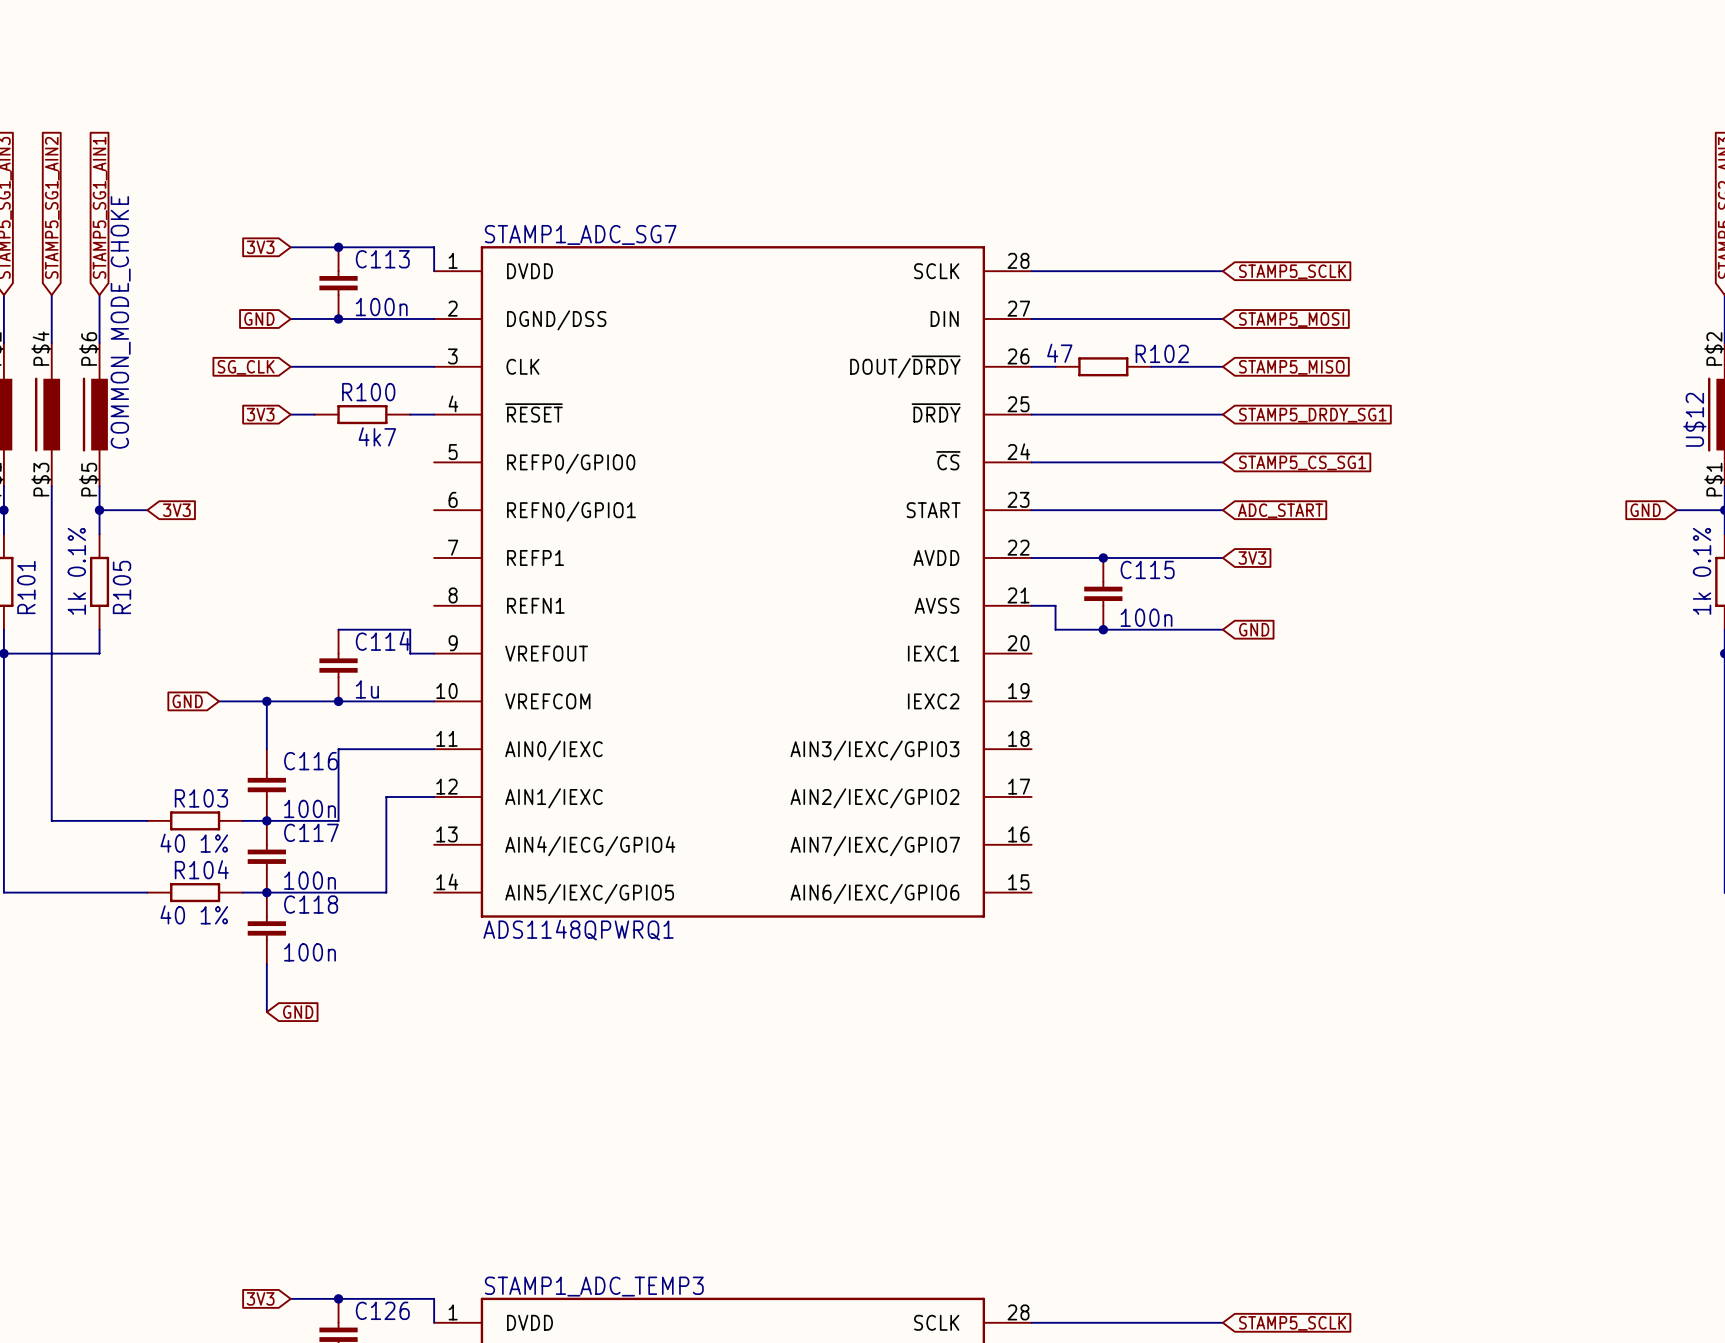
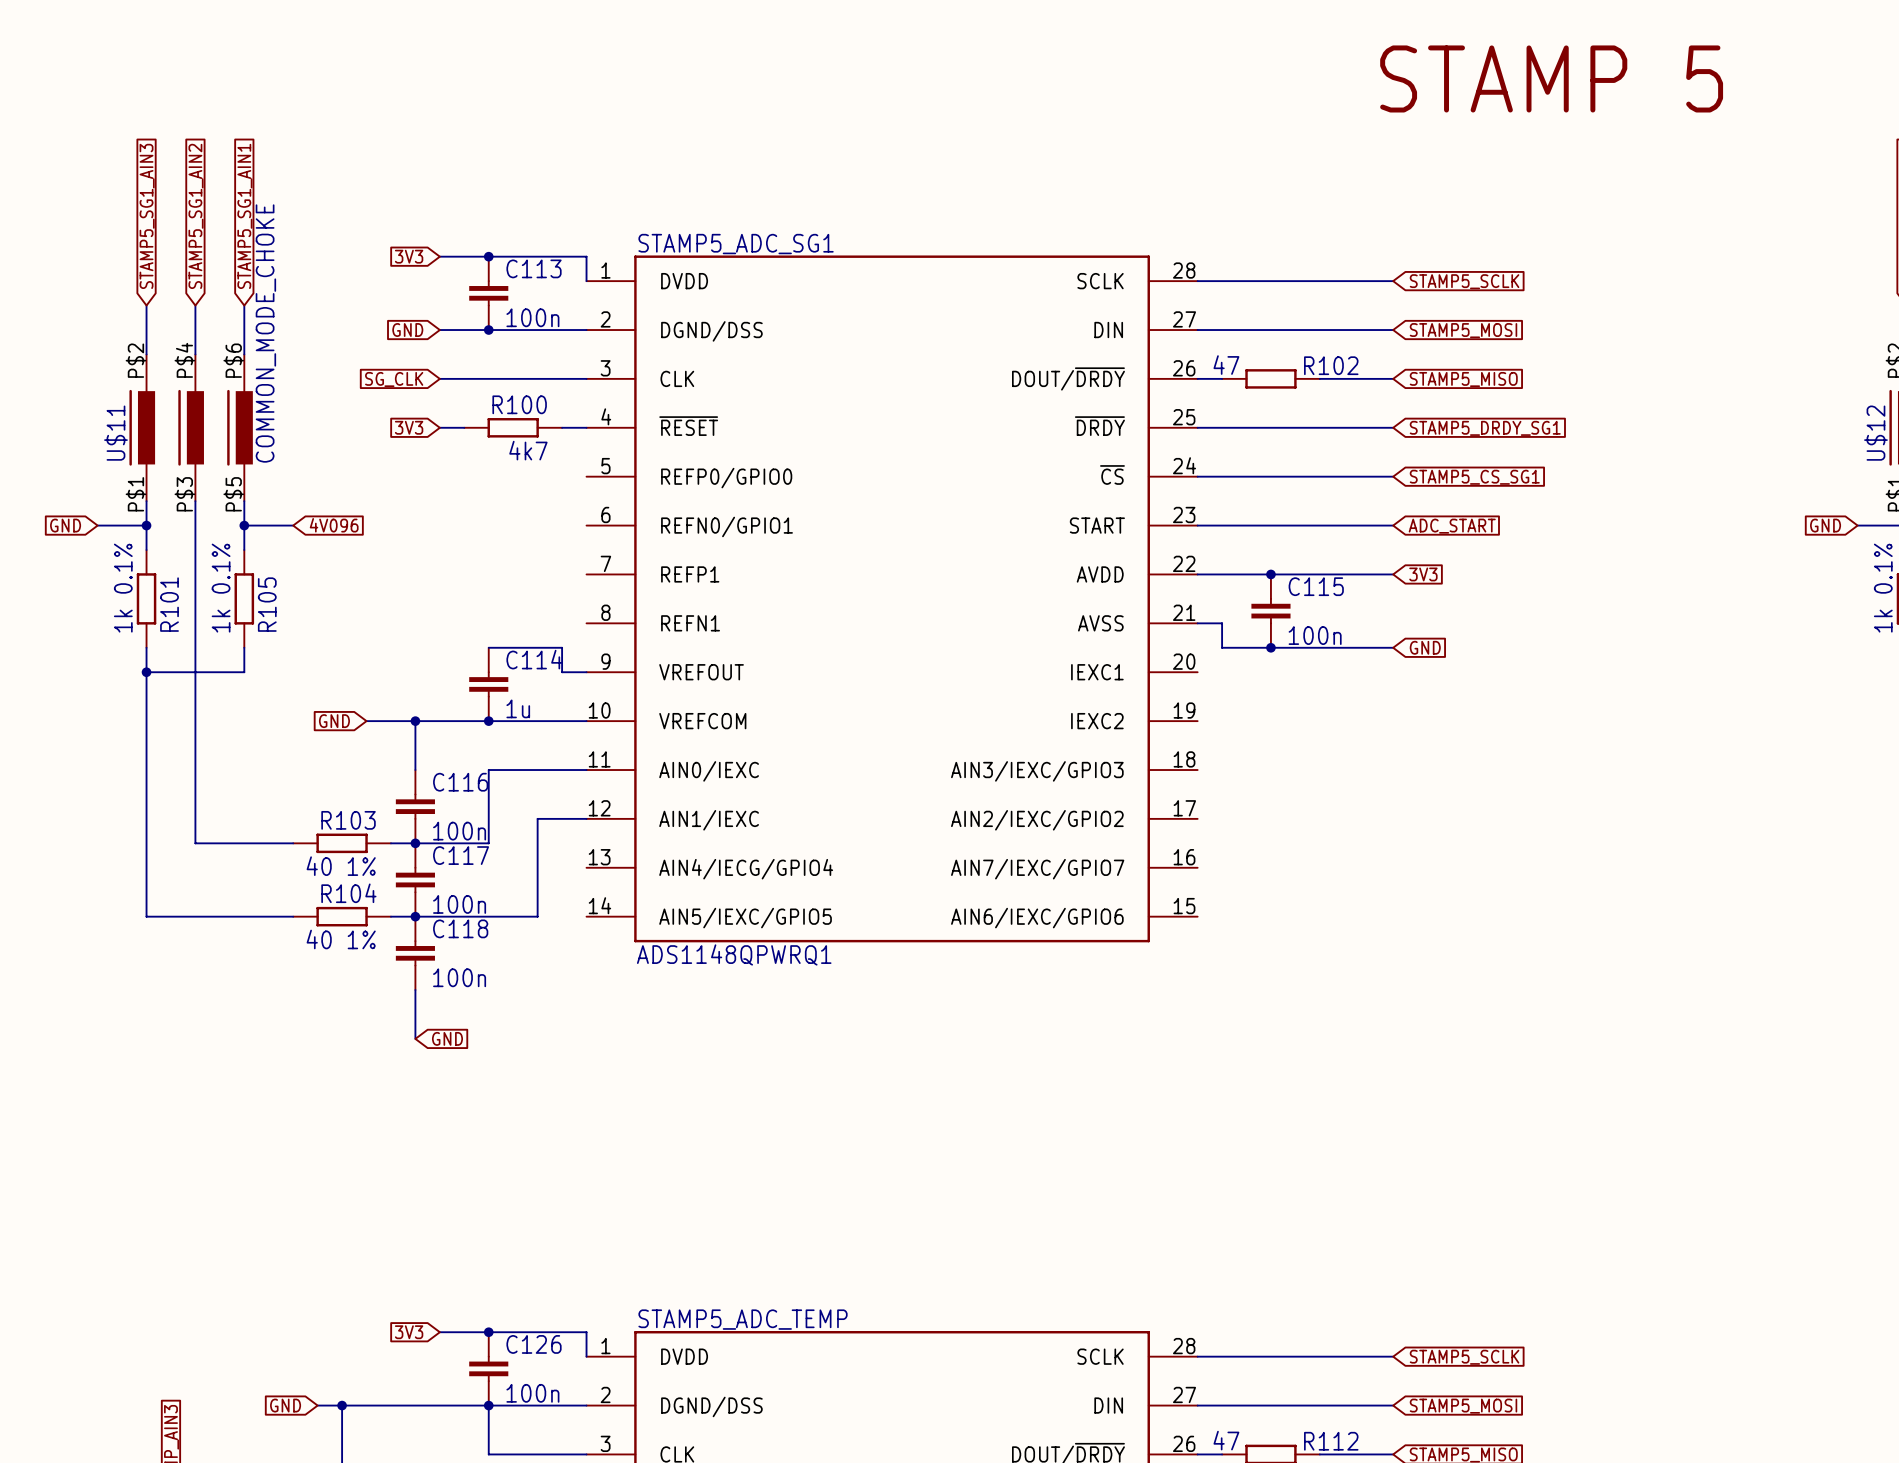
text: none -> STAMP 5 (1551, 78)
STAMP1_ADC_SG7 name: STAMP1_ADC_SG7 (580, 234) -> STAMP5_ADC_SG1 (736, 244)
global label: 3V3 (176, 510) -> 4V096 (334, 525)
STAMP1_ADC_TEMP3 name: STAMP1_ADC_TEMP3 (594, 1286) -> STAMP5_ADC_TEMP (743, 1319)

